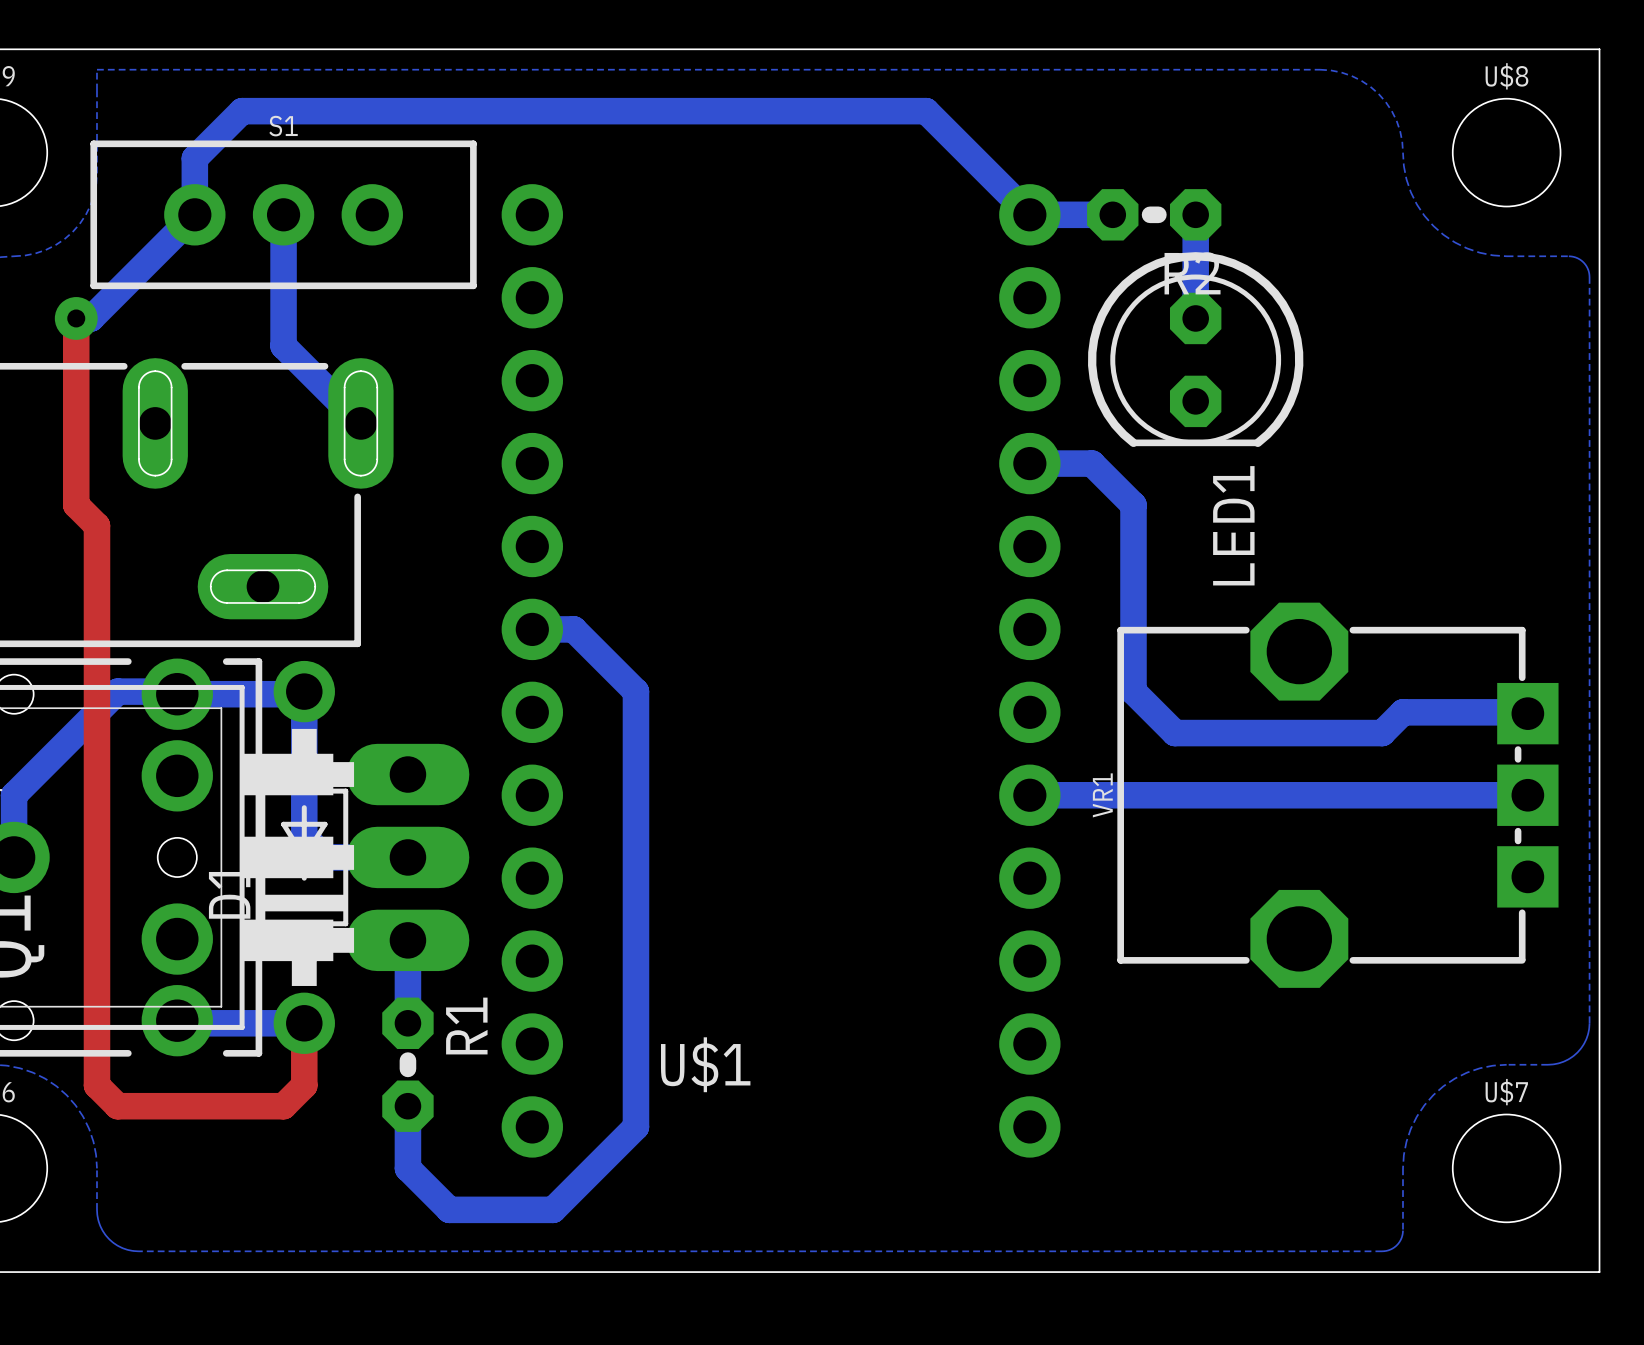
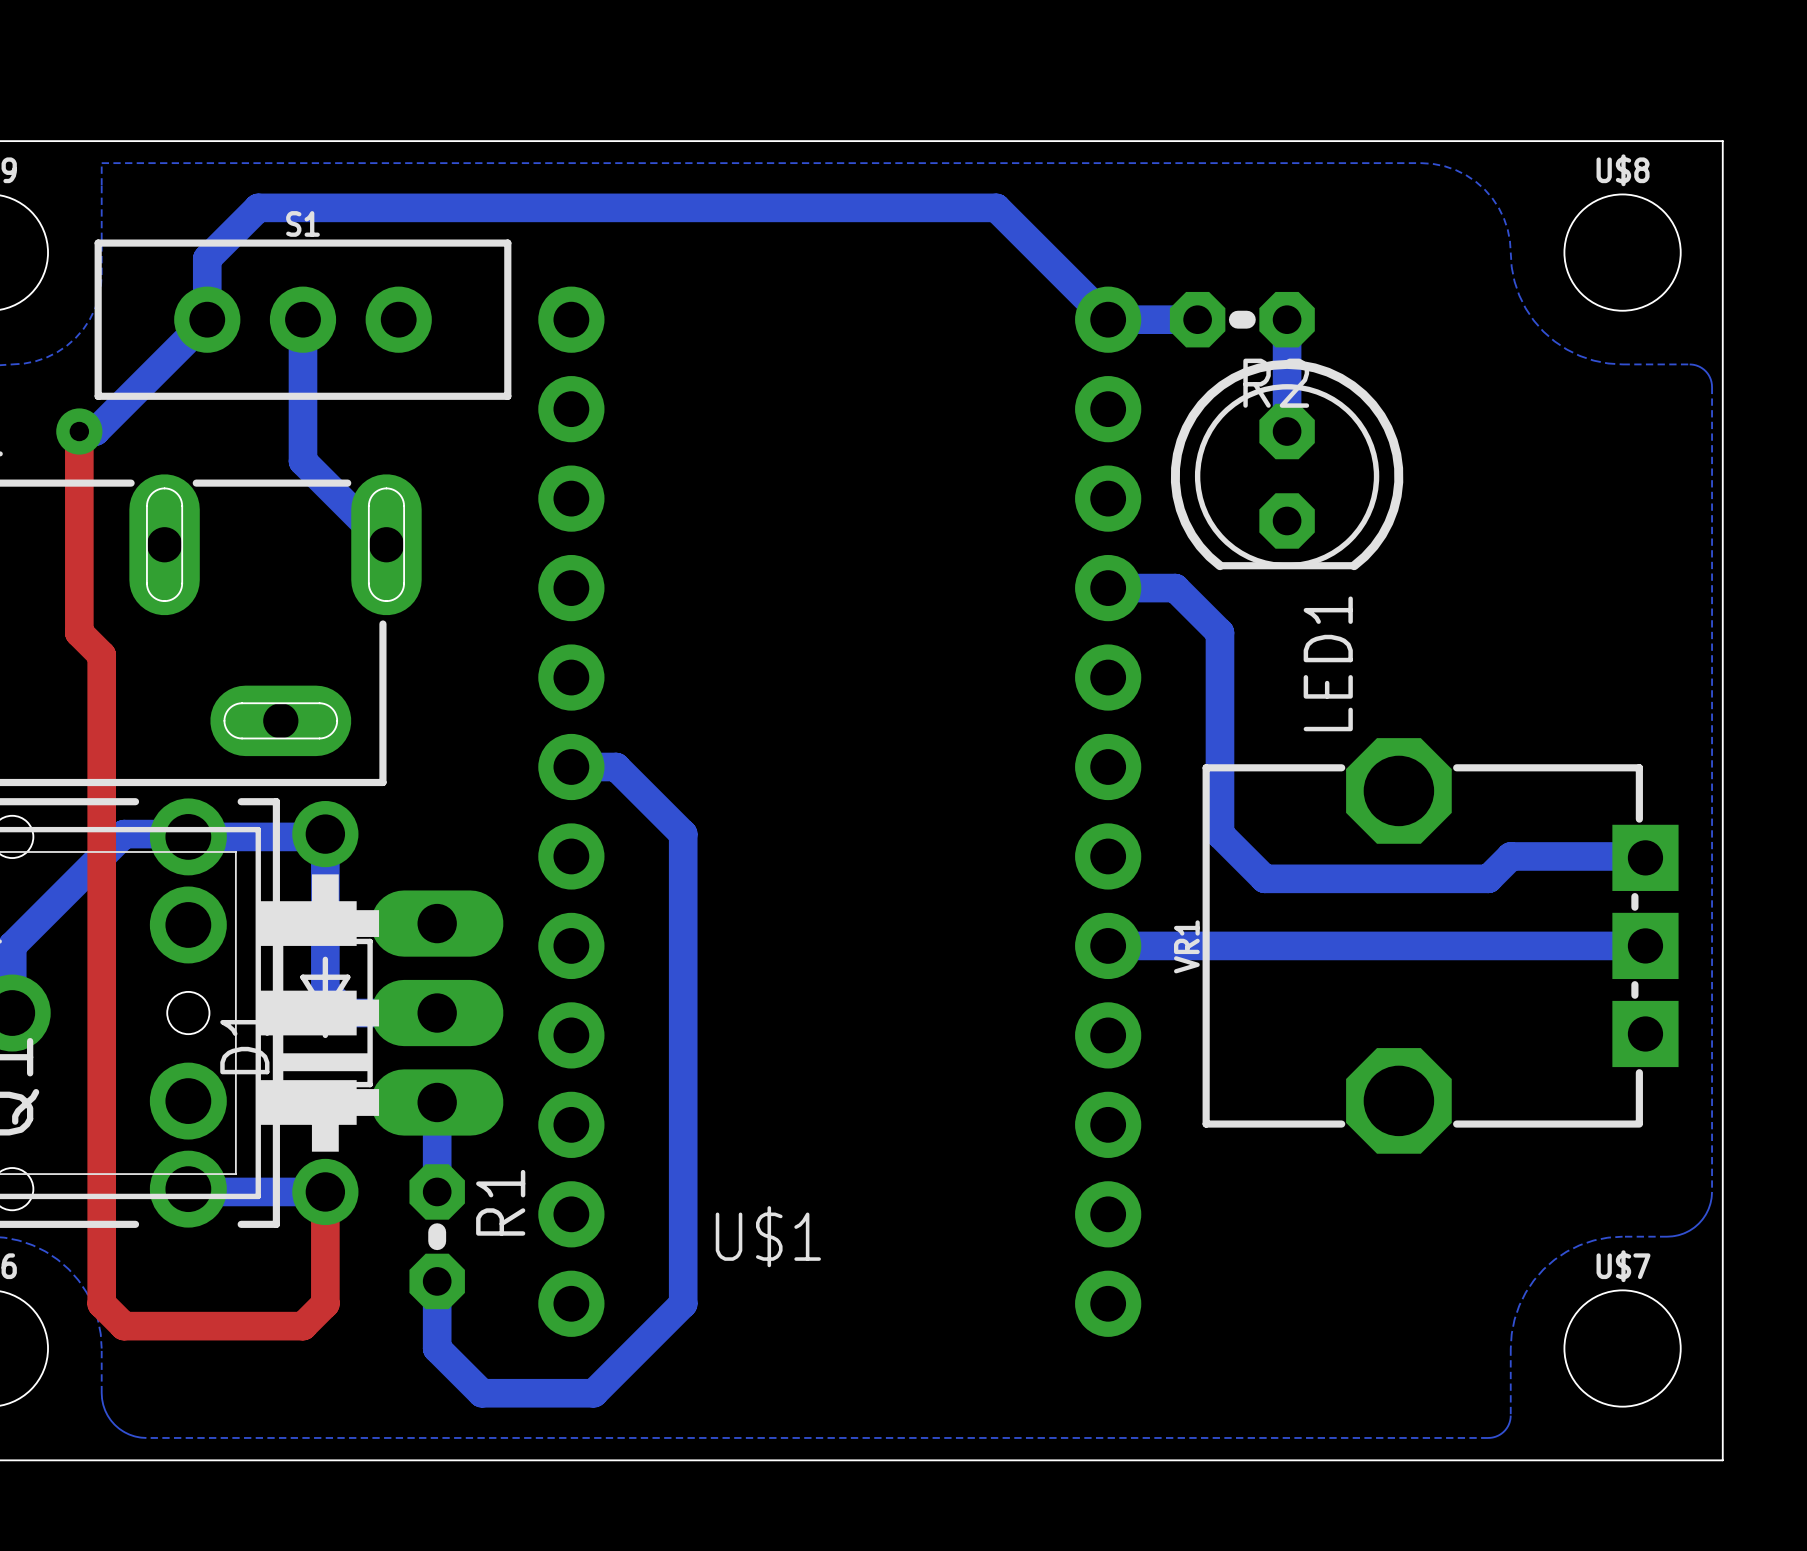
top track: (96, 1085) (117, 1106) (283, 1106) (304, 1085) -> (101, 1259) (101, 1303) (124, 1326) (302, 1326) (325, 1303) (325, 1259)

